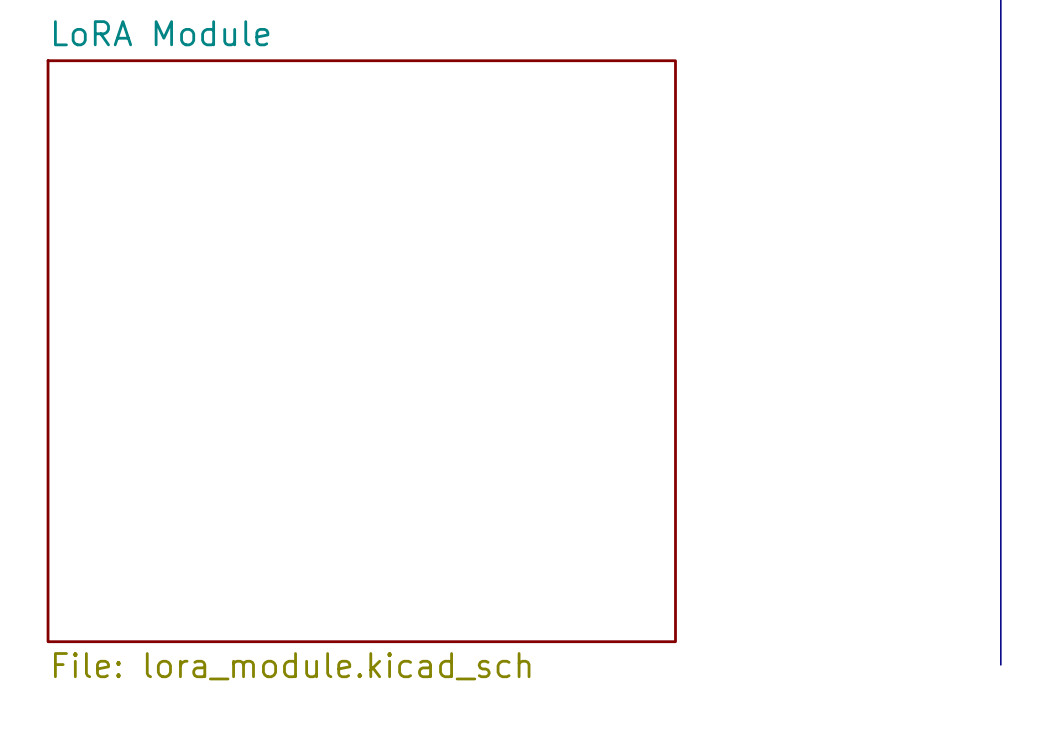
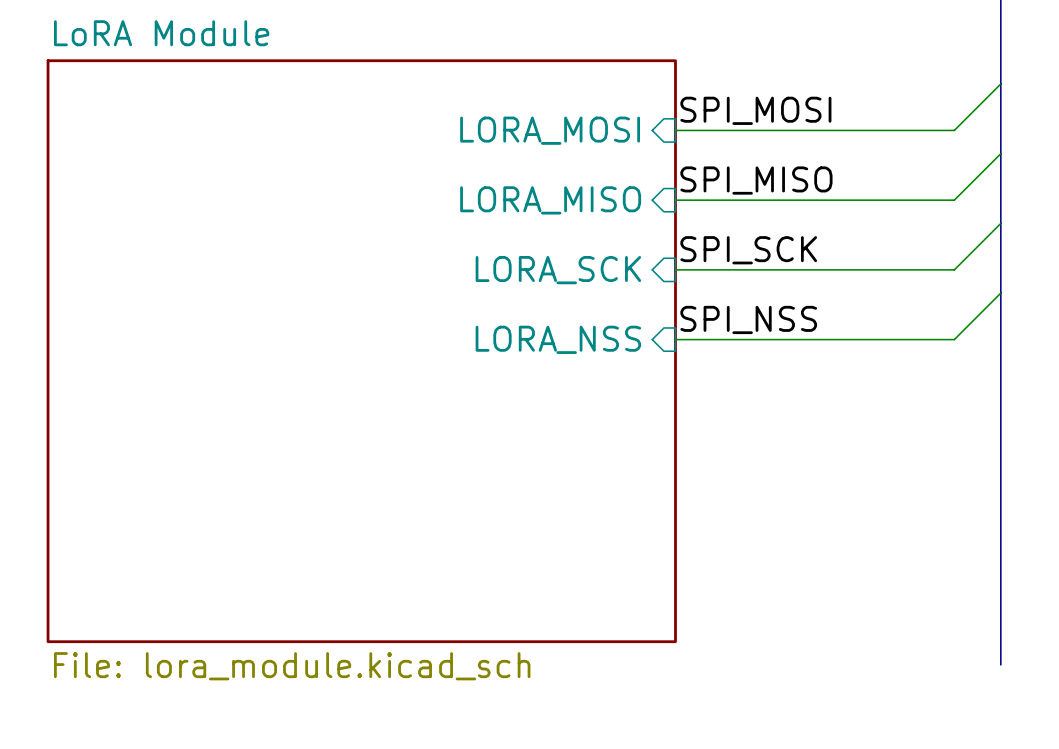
wire: none -> (1000, 83) (954, 130) (675, 130)
label: none -> SPI_MOSI (755, 110)
sheet pin: none -> LORA_MOSI (550, 130)
wire: none -> (1000, 153) (954, 200) (675, 200)
label: none -> SPI_MISO (756, 180)
sheet pin: none -> LORA_MISO (550, 200)
wire: none -> (1000, 223) (954, 269) (675, 269)
label: none -> SPI_SCK (748, 250)
sheet pin: none -> LORA_SCK (558, 270)
wire: none -> (1000, 293) (954, 339) (675, 339)
label: none -> SPI_NSS (748, 319)
sheet pin: none -> LORA_NSS (558, 339)

